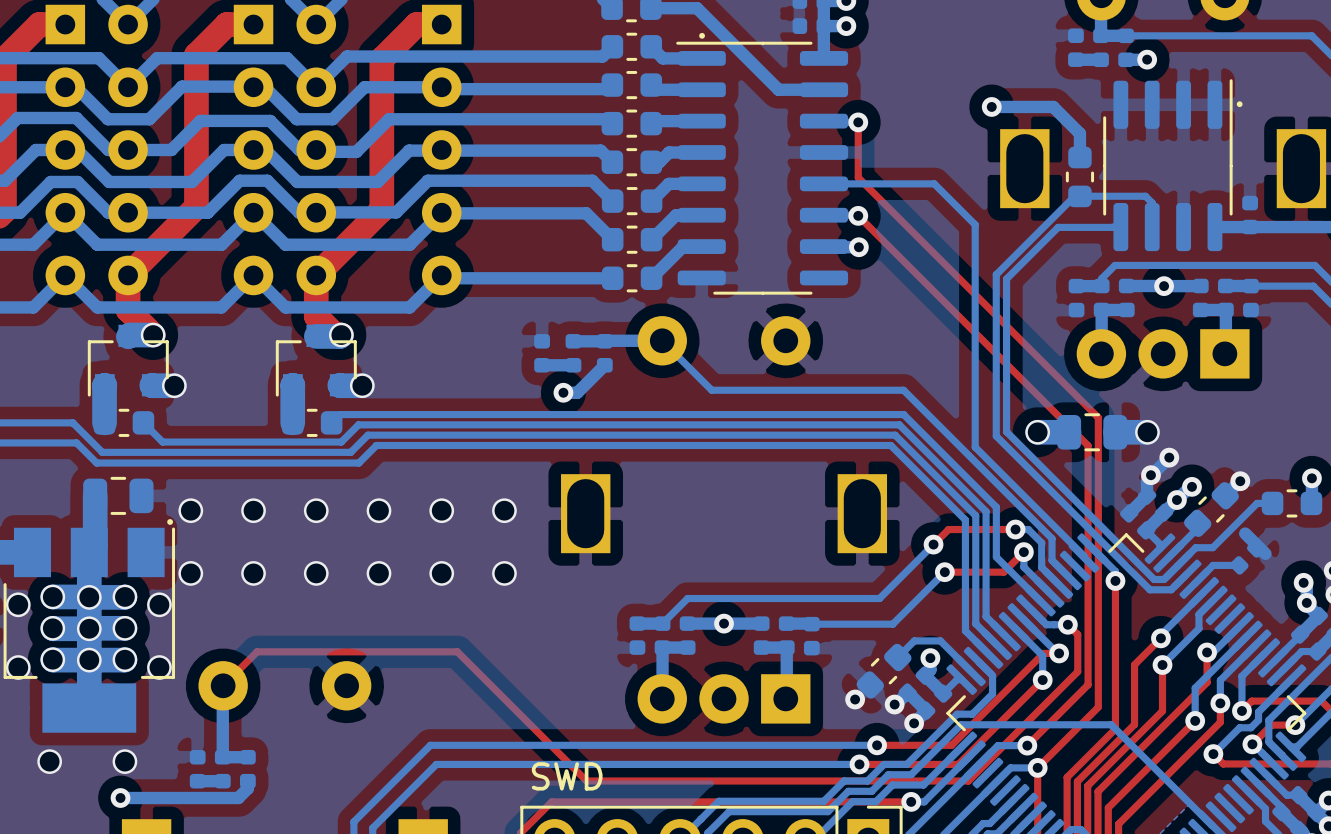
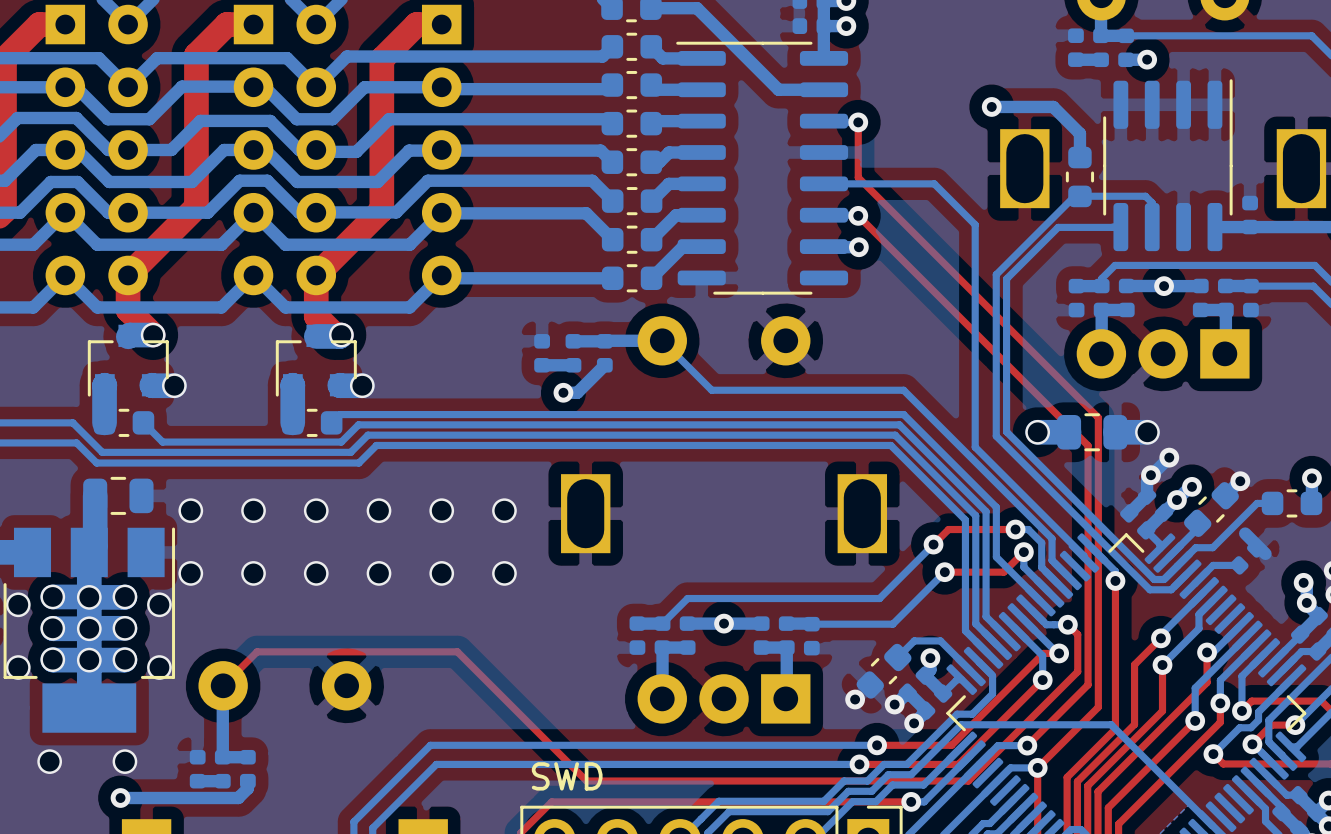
drawing: [699, 32, 705, 39] -> none
drawing: [1236, 101, 1243, 108] -> none
drawing: [167, 519, 173, 525] -> none

